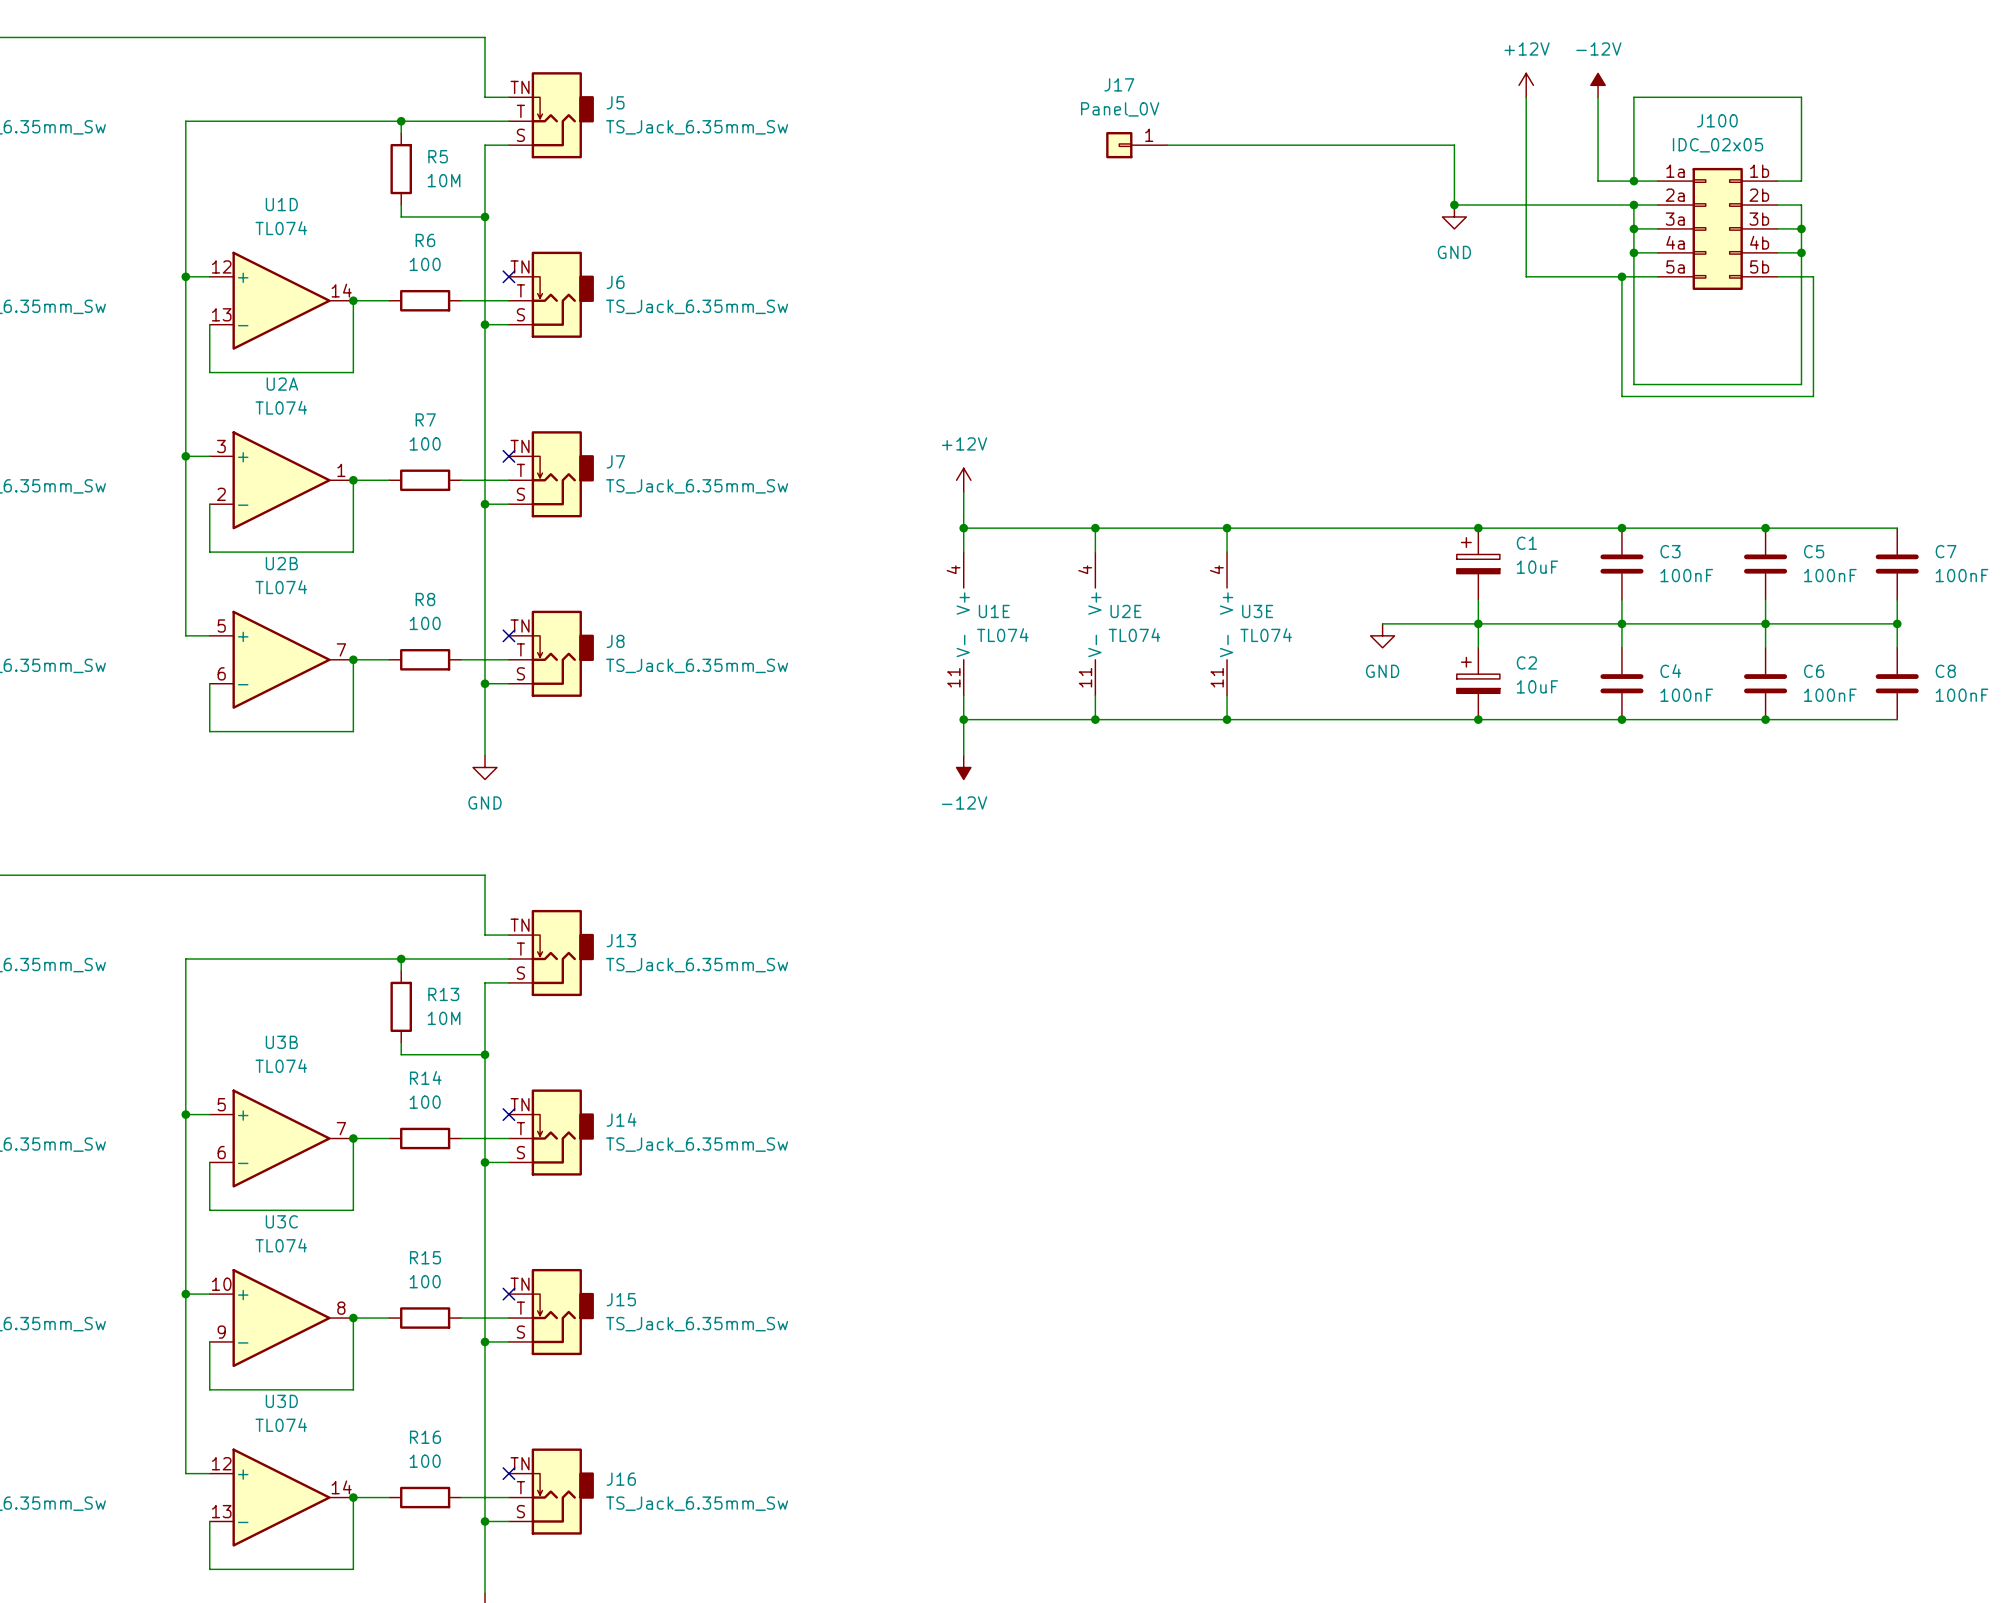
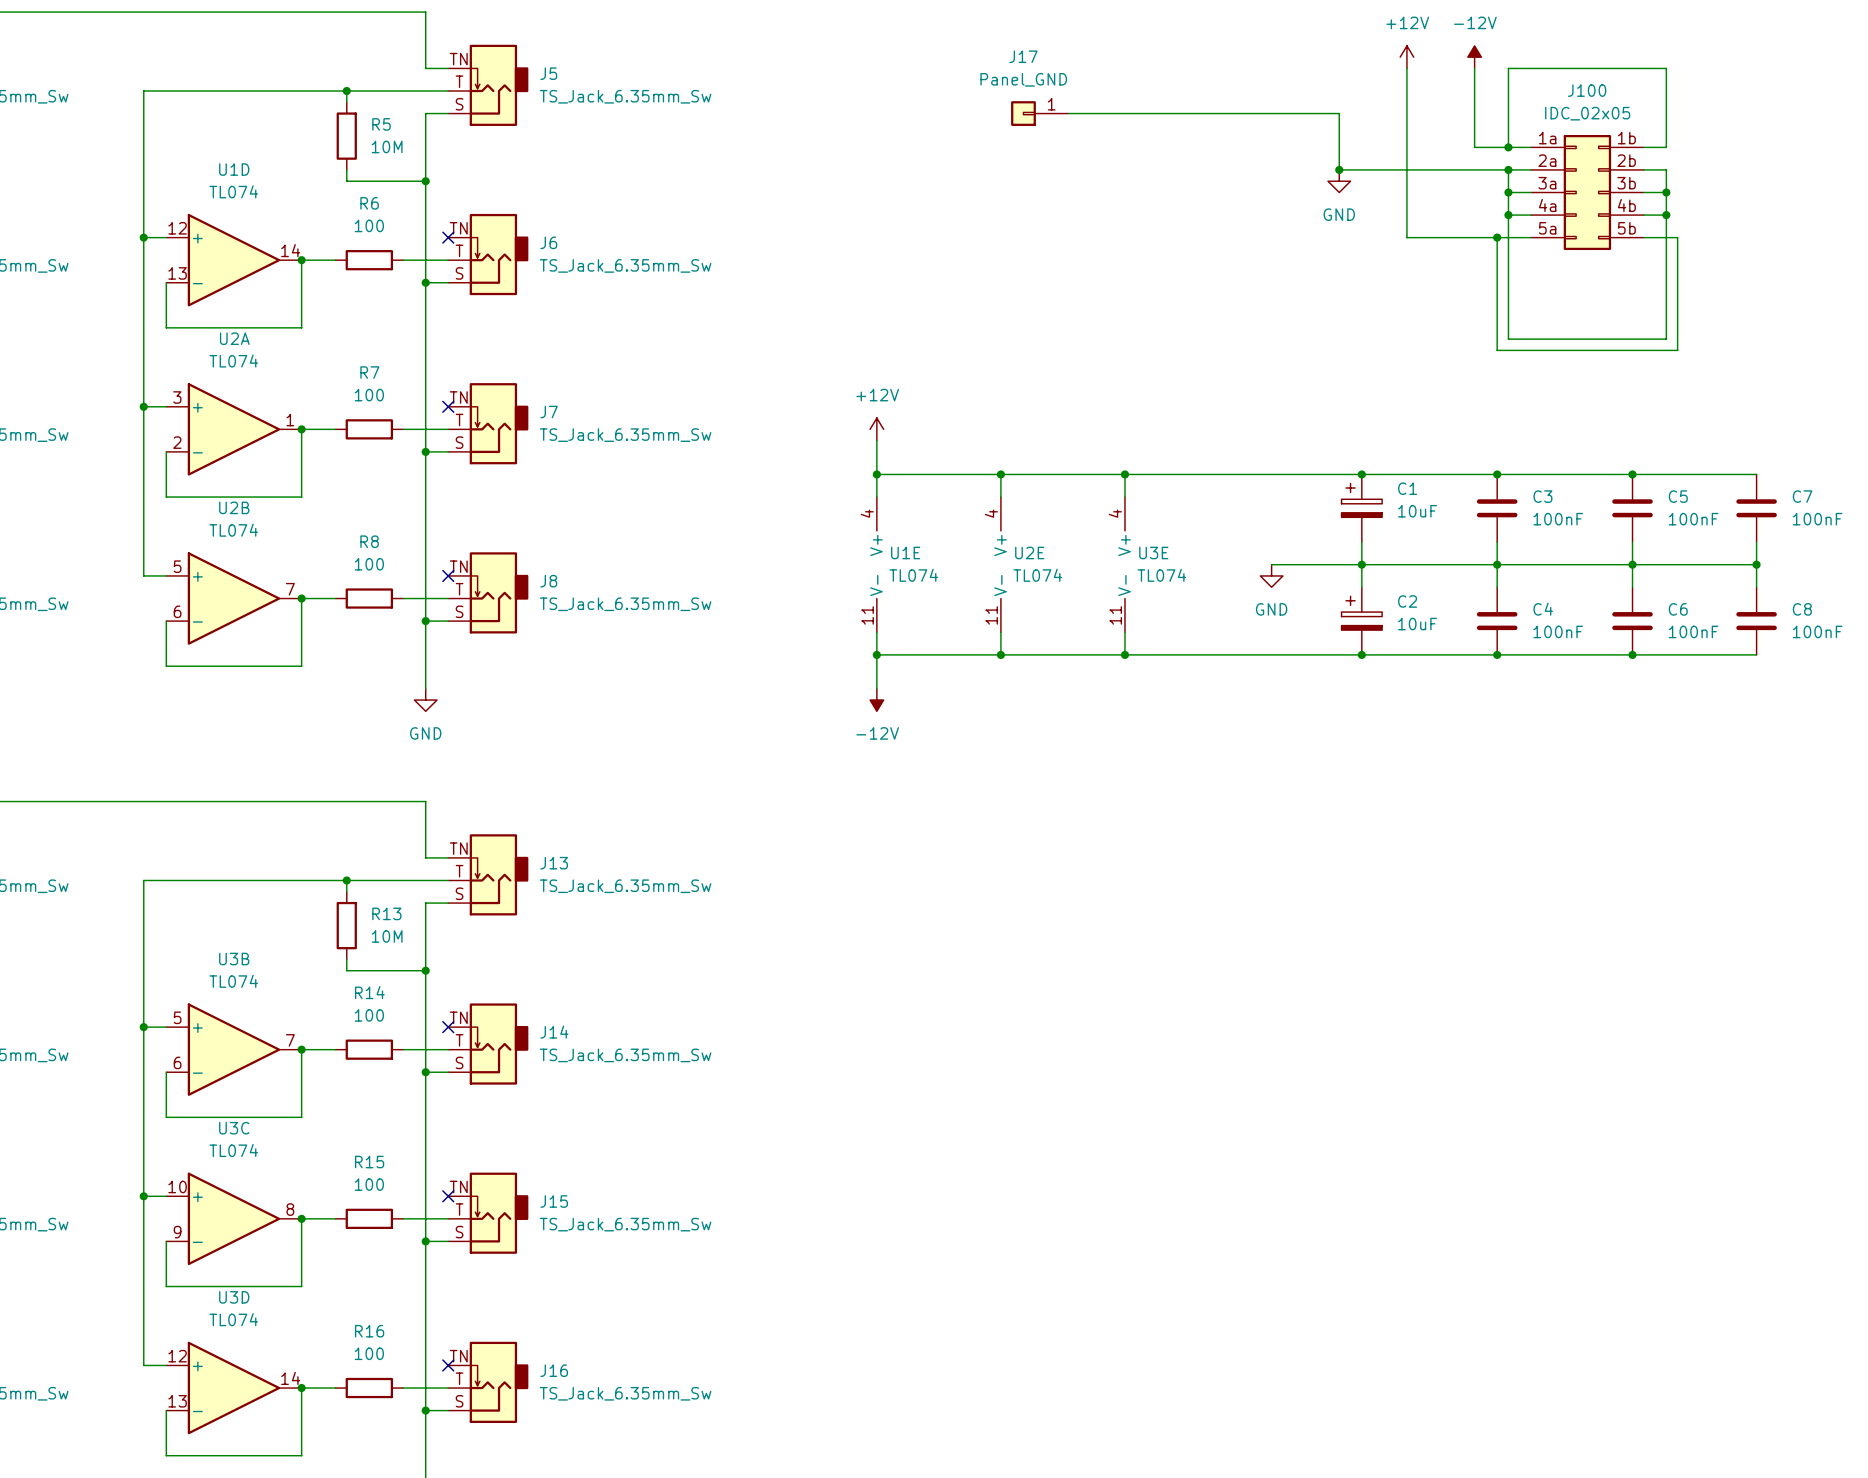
J17 value: Panel_0V (1120, 109) -> Panel_GND (1023, 79)

